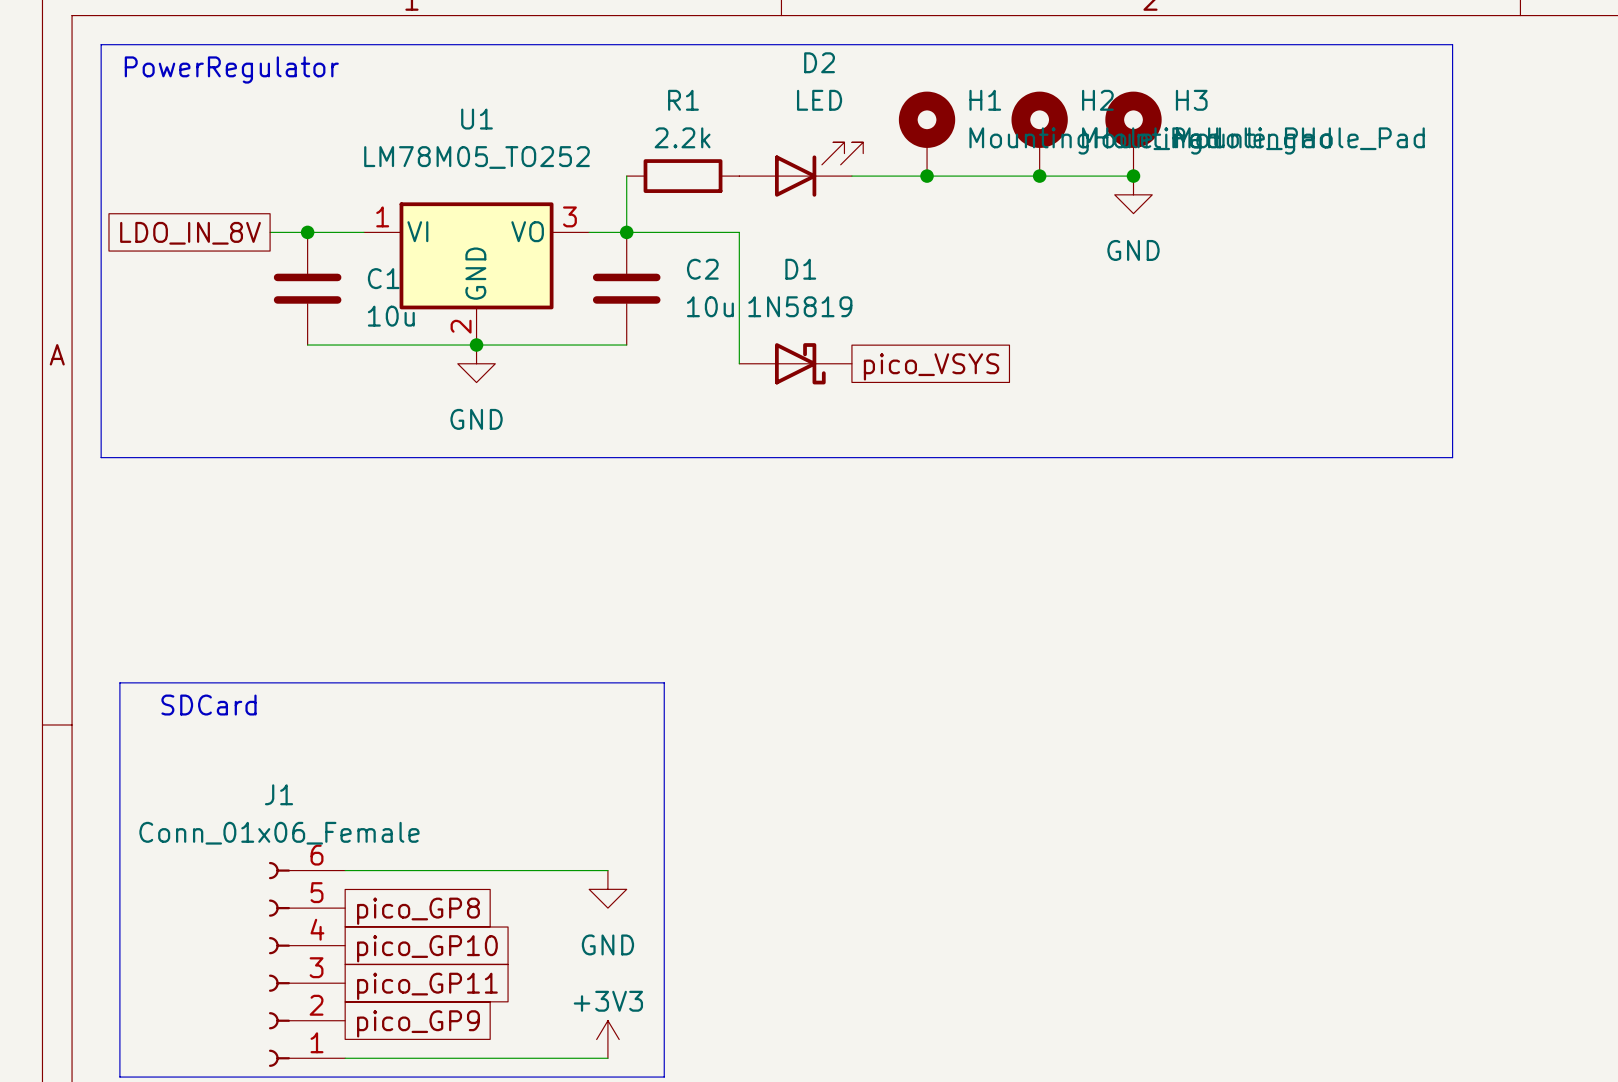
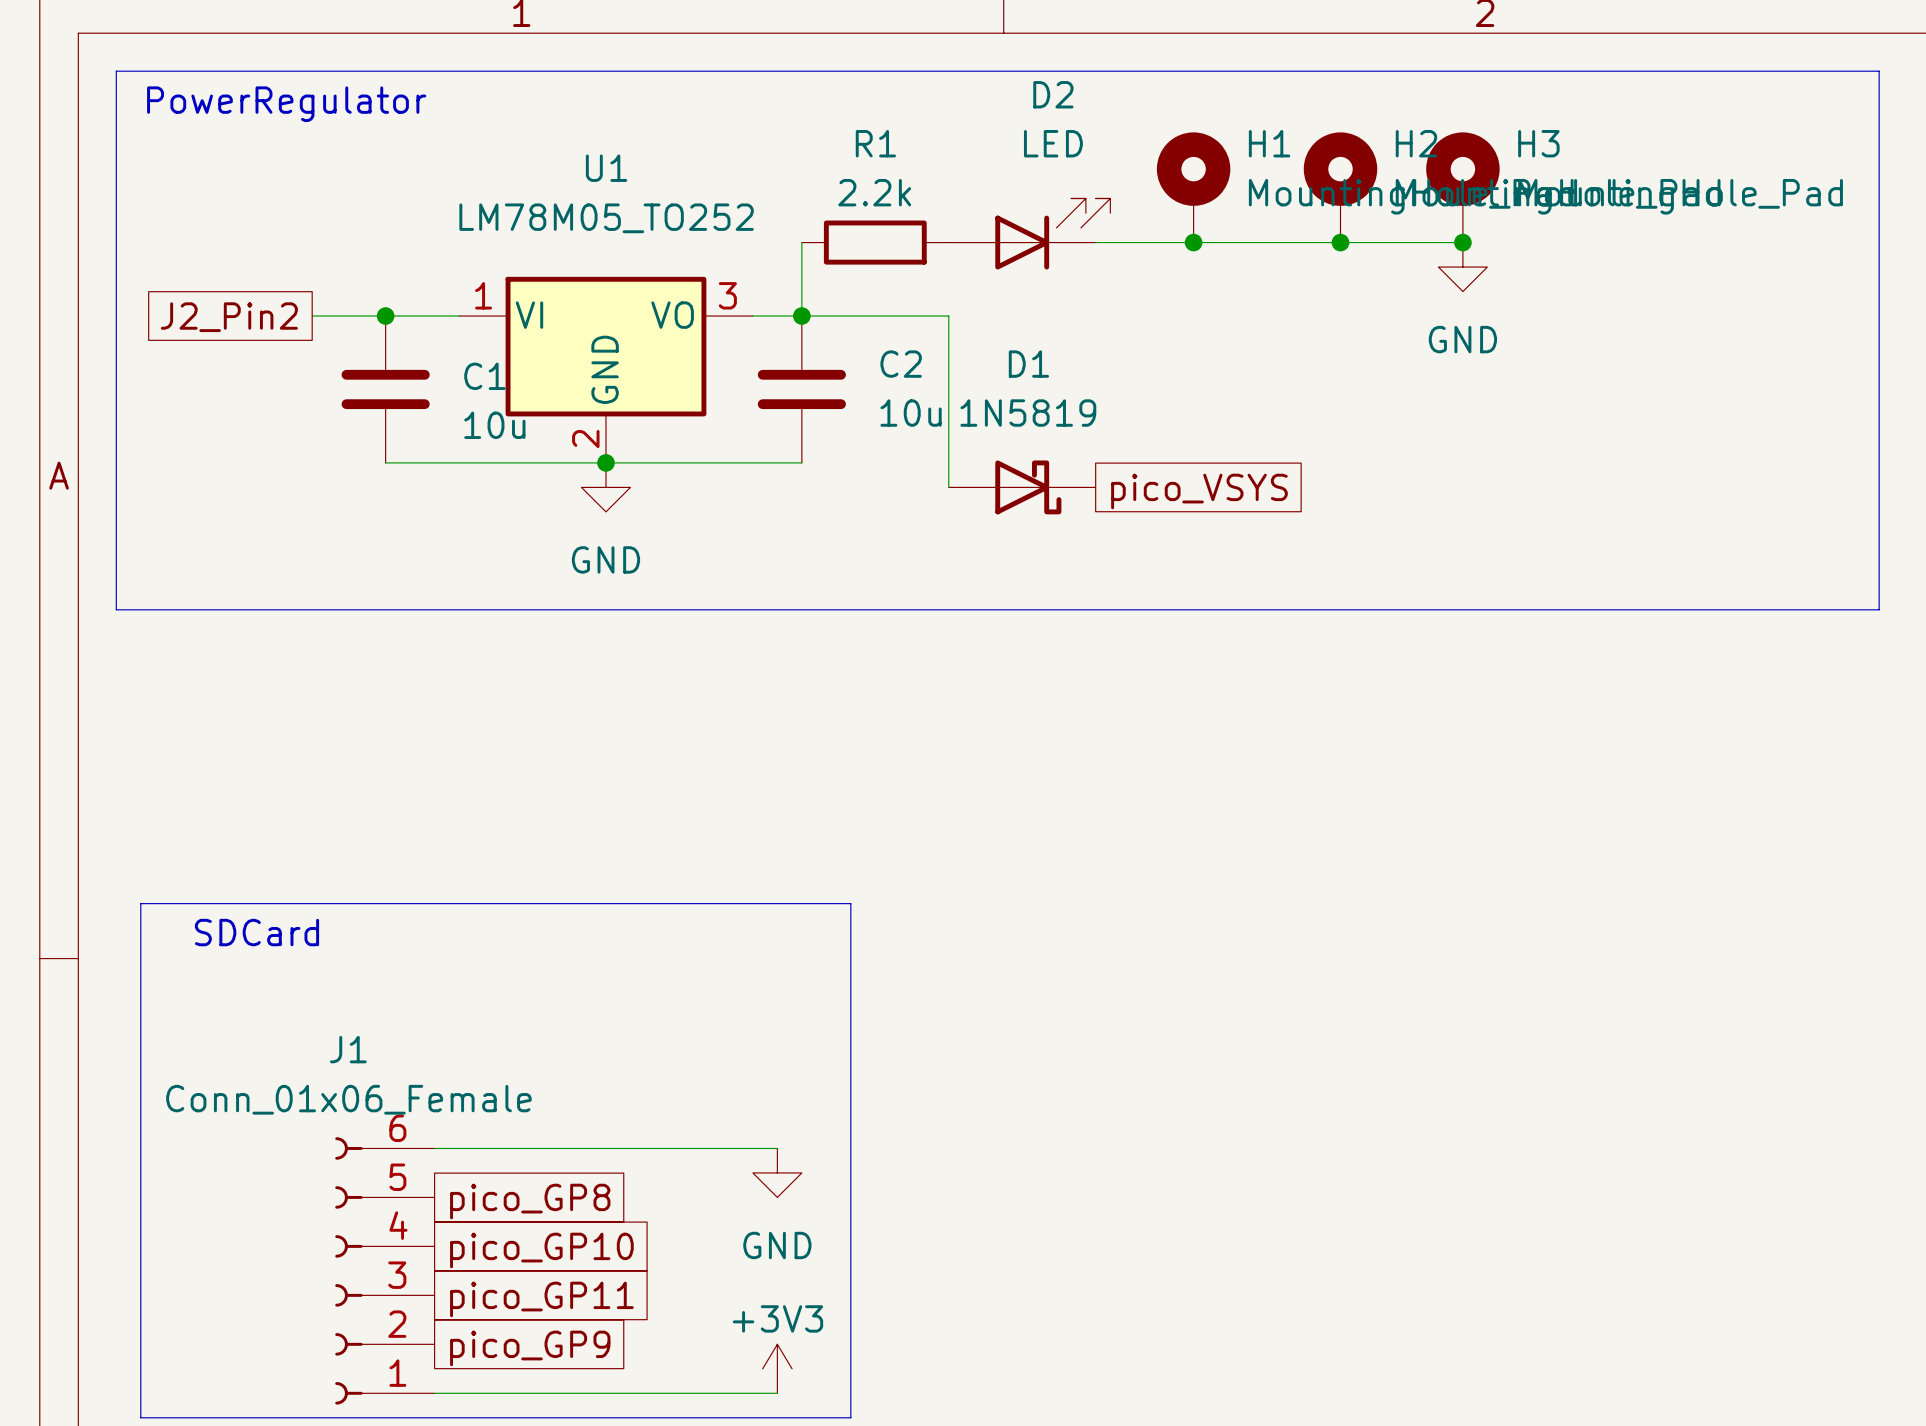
wire: none -> (312, 316) (336, 316)
global label: none -> J2_Pin2 (229, 317)
global label: LDO_IN_8V (190, 233) -> none

